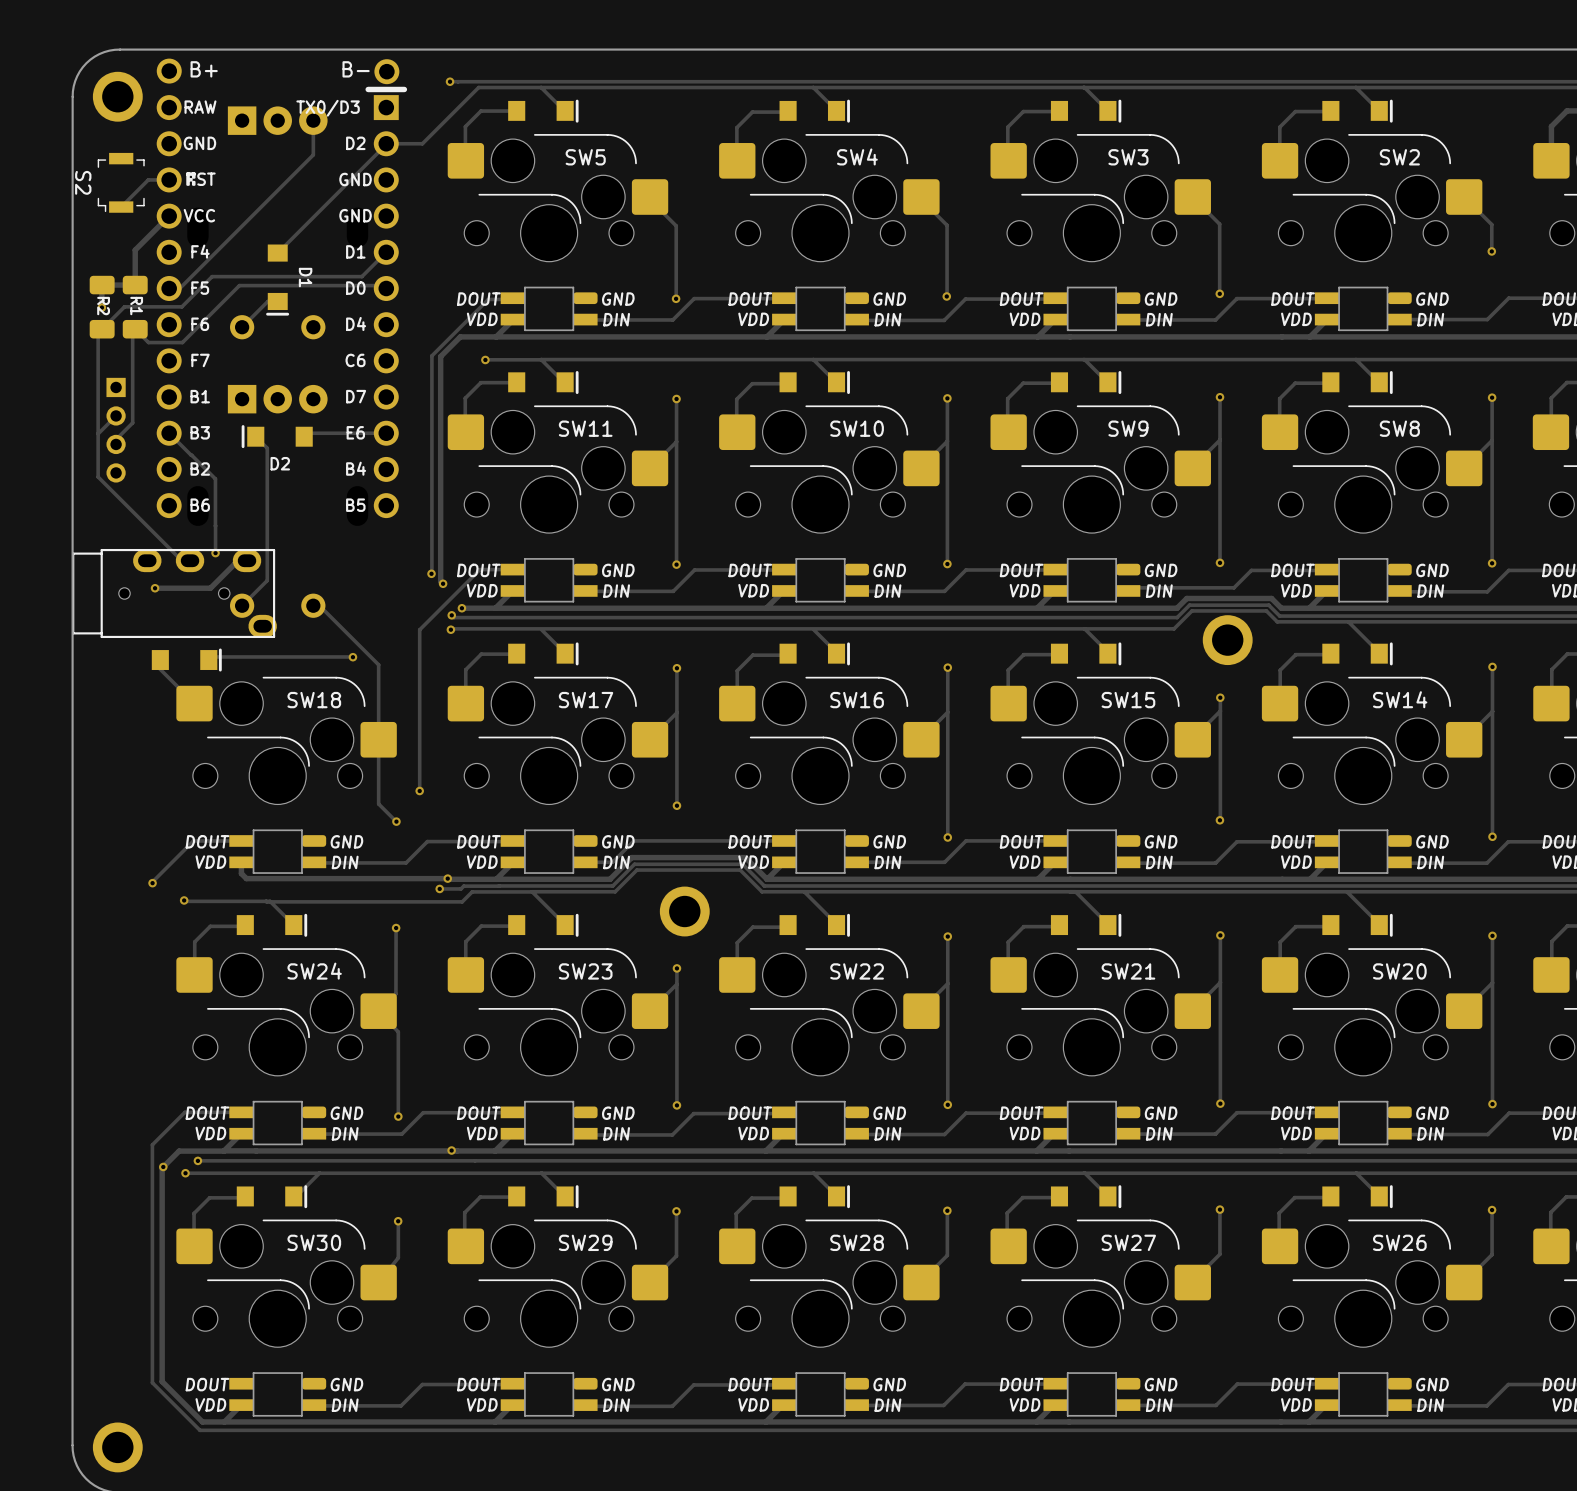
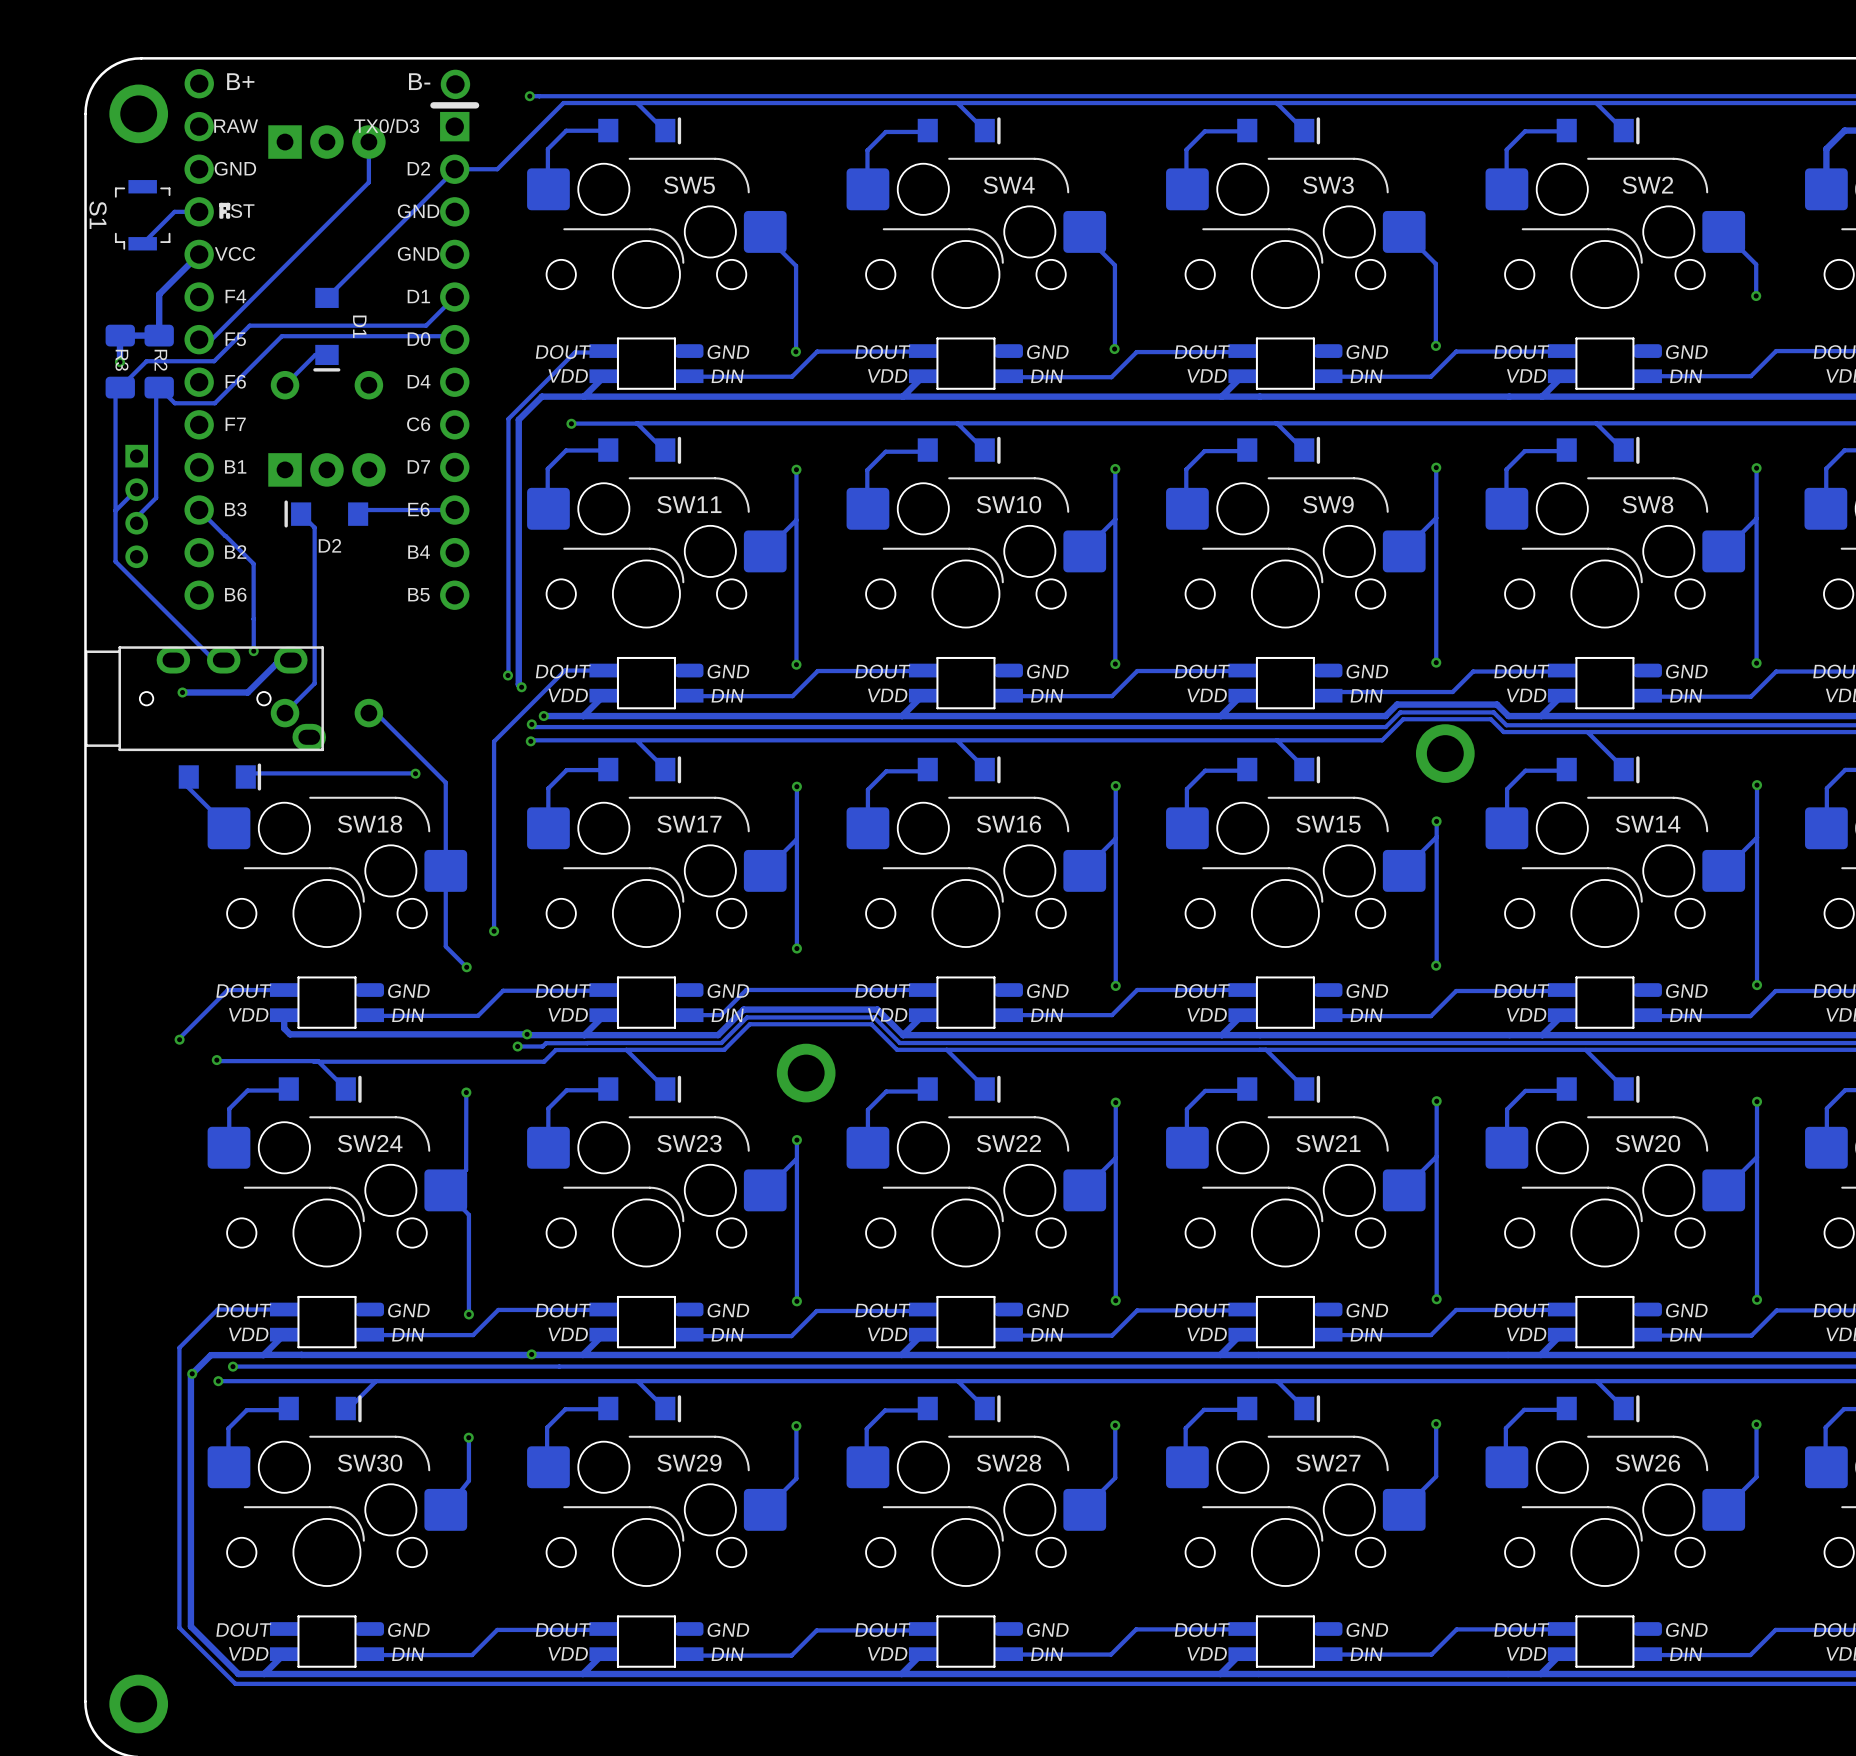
S2 name: S2 (83, 182) -> S1 (98, 215)
R2 name: R2 (103, 306) -> R3 (121, 360)
R1 name: R1 (136, 306) -> R2 (160, 360)

